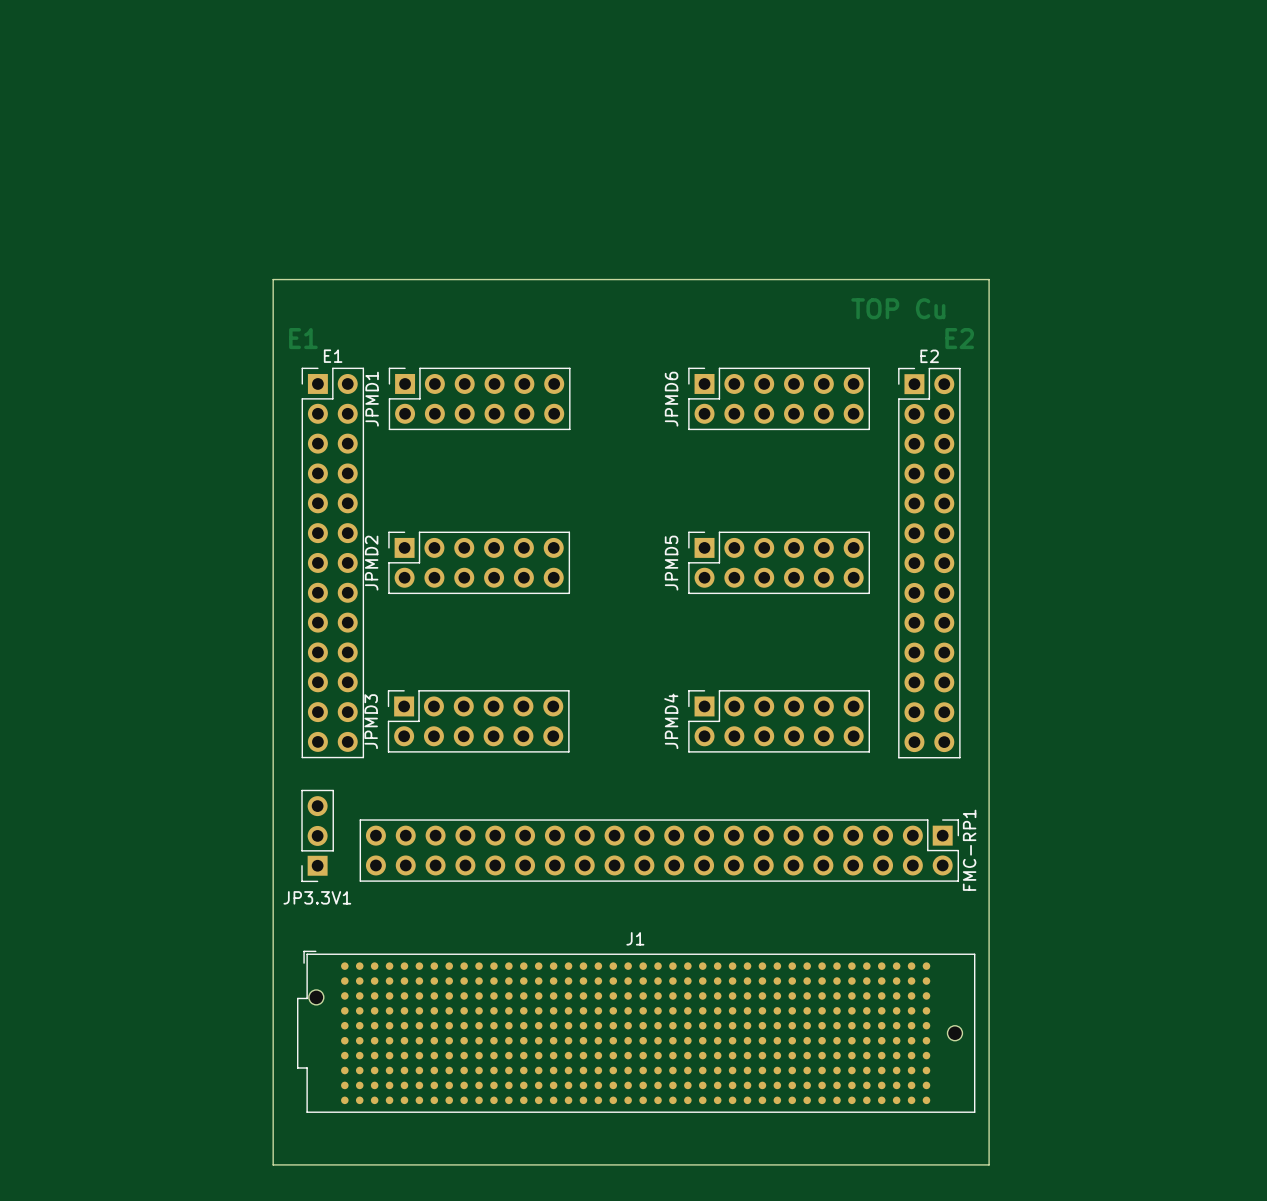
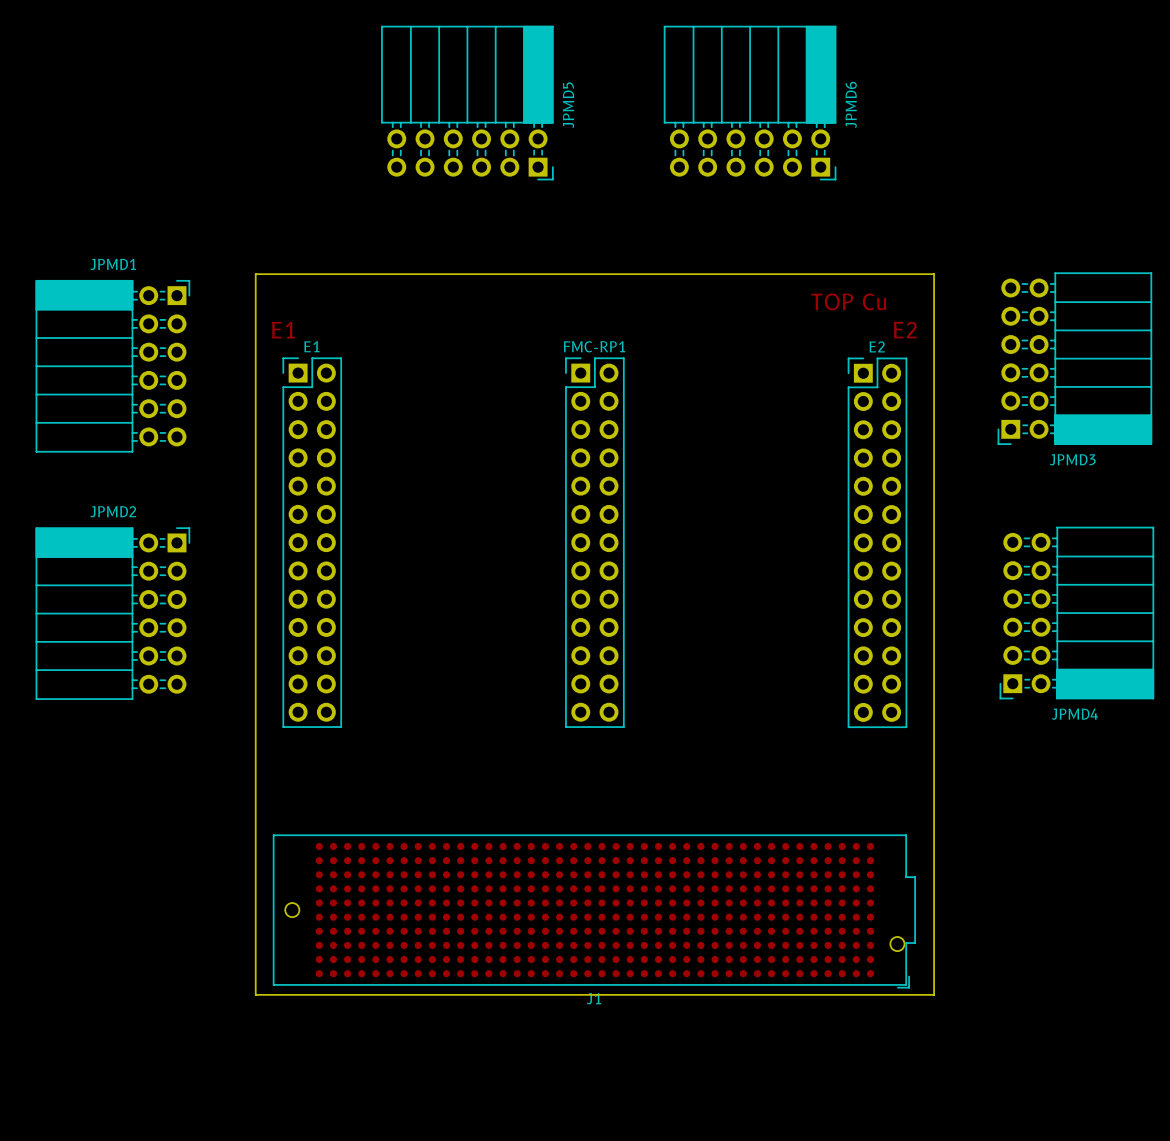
JPMD1 footprint: [388, 367, 571, 431] -> [35, 280, 191, 453]
JPMD6 footprint: [688, 367, 871, 431] -> [663, 25, 837, 181]
JPMD1 name position: JPMD1 (372, 399) -> JPMD1 (113, 264)
JPMD6 name position: JPMD6 (671, 399) -> JPMD6 (851, 104)
JPMD2 footprint: [388, 531, 571, 595] -> [35, 527, 191, 700]
JPMD5 footprint: [688, 531, 871, 595] -> [381, 25, 554, 181]
JPMD2 name position: JPMD2 (371, 563) -> JPMD2 (113, 511)
JPMD5 name position: JPMD5 (671, 563) -> JPMD5 (568, 105)
JPMD3 footprint: [387, 690, 570, 753] -> [997, 272, 1152, 445]
JPMD4 footprint: [688, 690, 871, 753] -> [999, 526, 1155, 700]
JPMD3 name position: JPMD3 (371, 721) -> JPMD3 (1072, 459)
JPMD4 name position: JPMD4 (671, 721) -> JPMD4 (1074, 714)
FMC-RP1 footprint: [359, 819, 960, 882] -> [565, 357, 625, 728]
JP3.3V1: (317, 835) -> none
FMC-RP1 name position: FMC-RP1 (969, 850) -> FMC-RP1 (594, 346)
J1 rotation: 0° (636, 1031) -> 180° (594, 911)
board edge: (273, 1040) (273, 1164) (989, 1164) (989, 1040) -> (255, 994) (934, 994)

